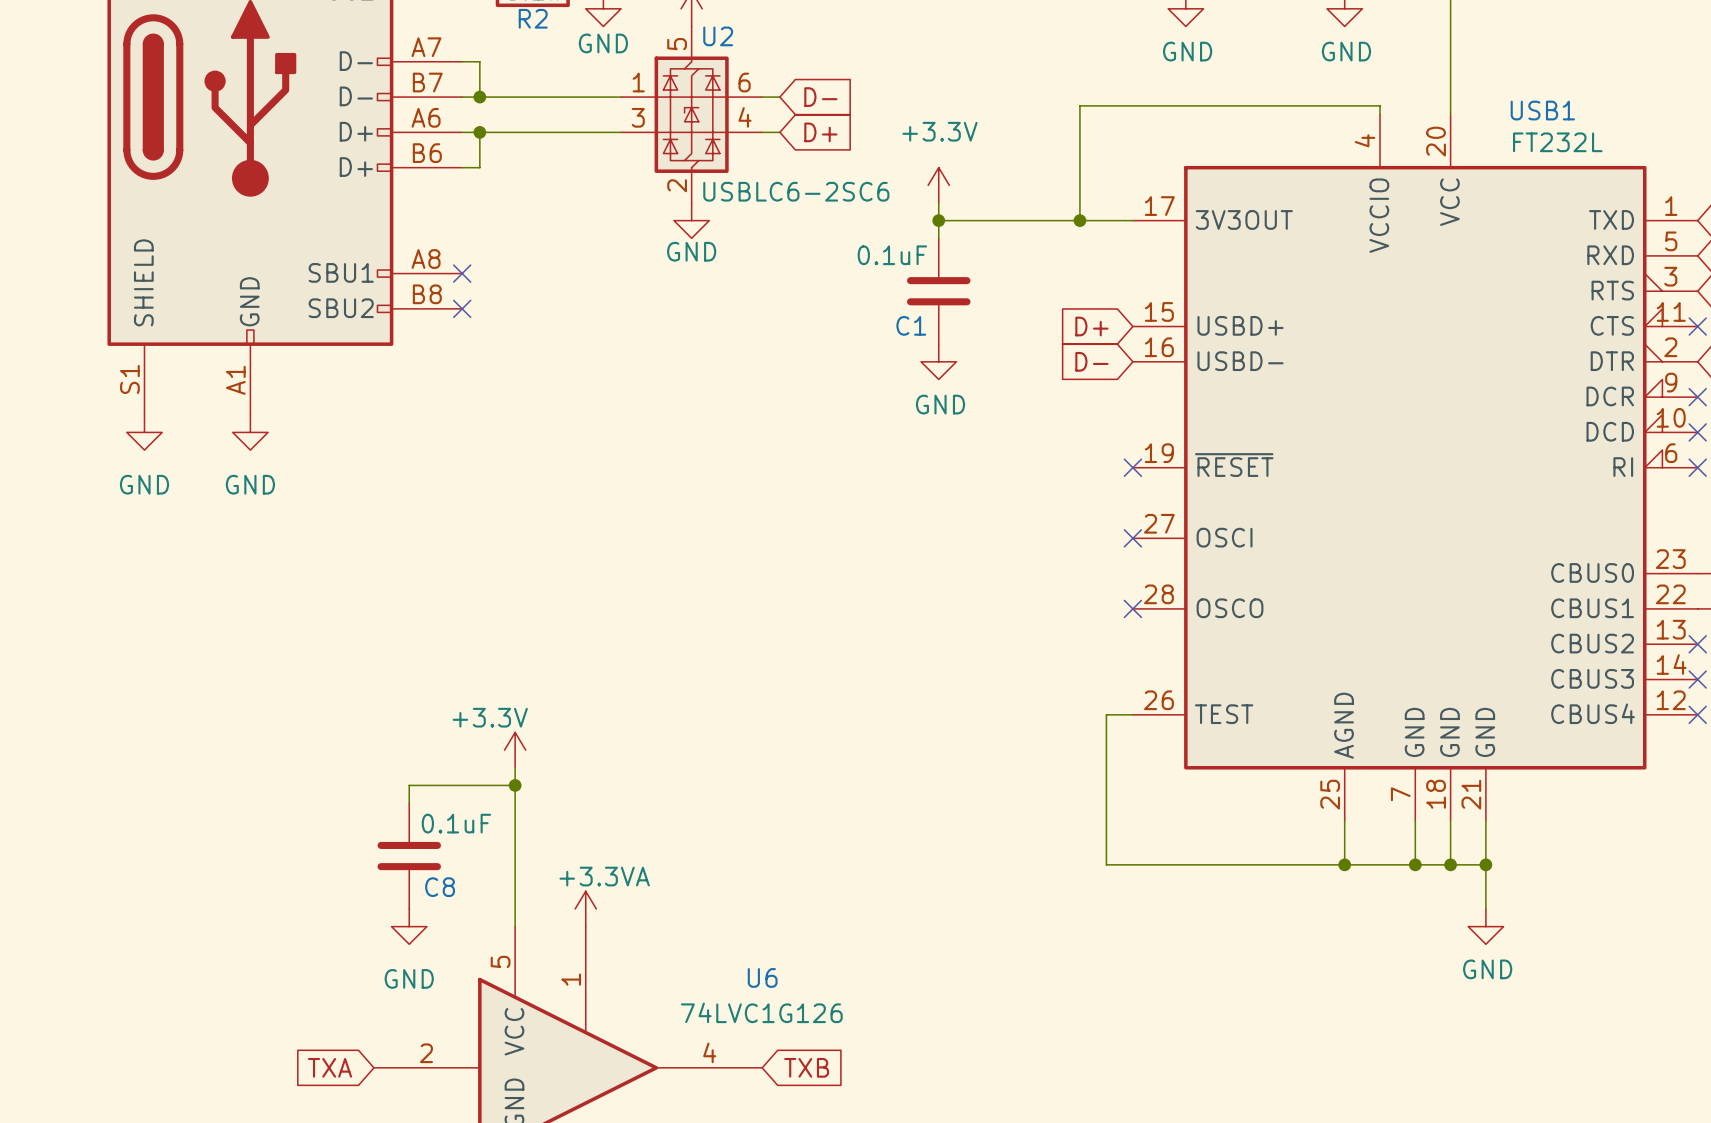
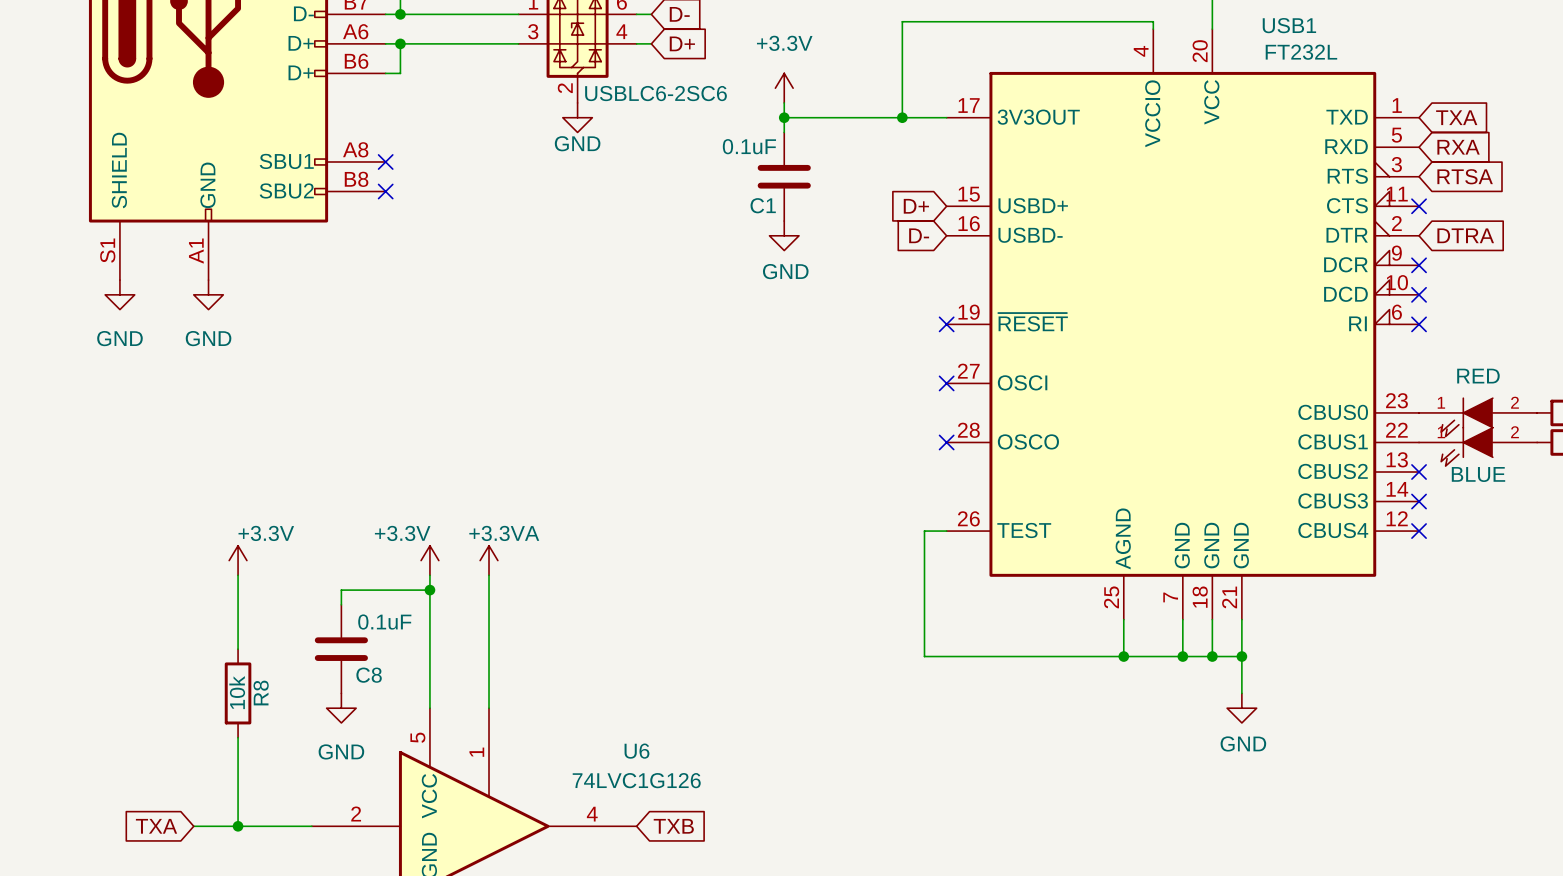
power symbol: none -> +3.3V (238, 560)
wire: none -> (238, 575) (238, 649)
wire: none -> (489, 575) (489, 708)
R8: none -> 10k (238, 693)
power symbol position: +3.3VA (585, 908) -> +3.3VA (489, 560)
wire: none -> (238, 737) (238, 826)
wire: none -> (193, 826) (311, 826)
junction: none -> (238, 826)
global label position: TXA (330, 1067) -> TXA (156, 826)

